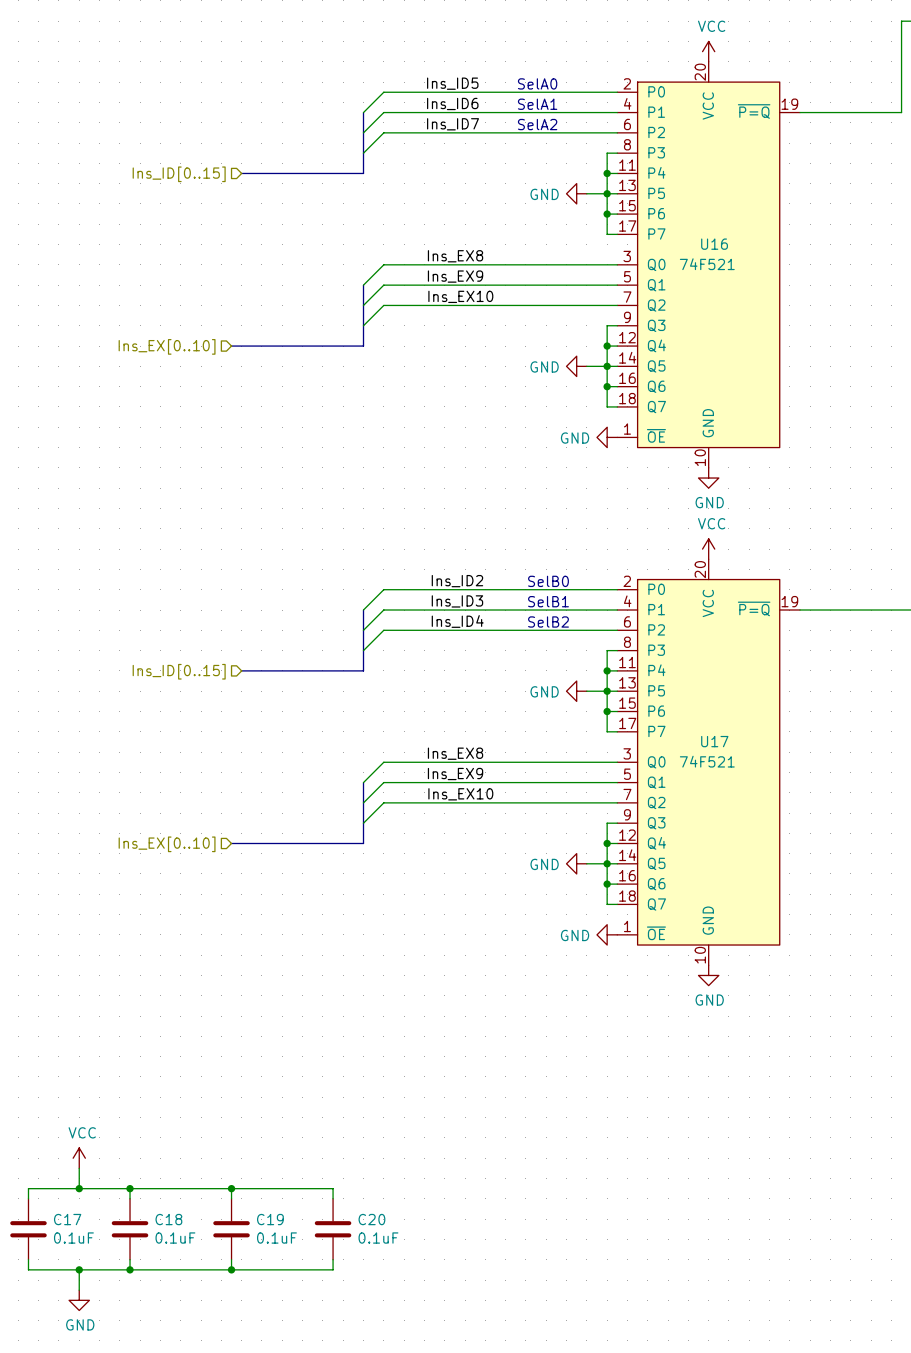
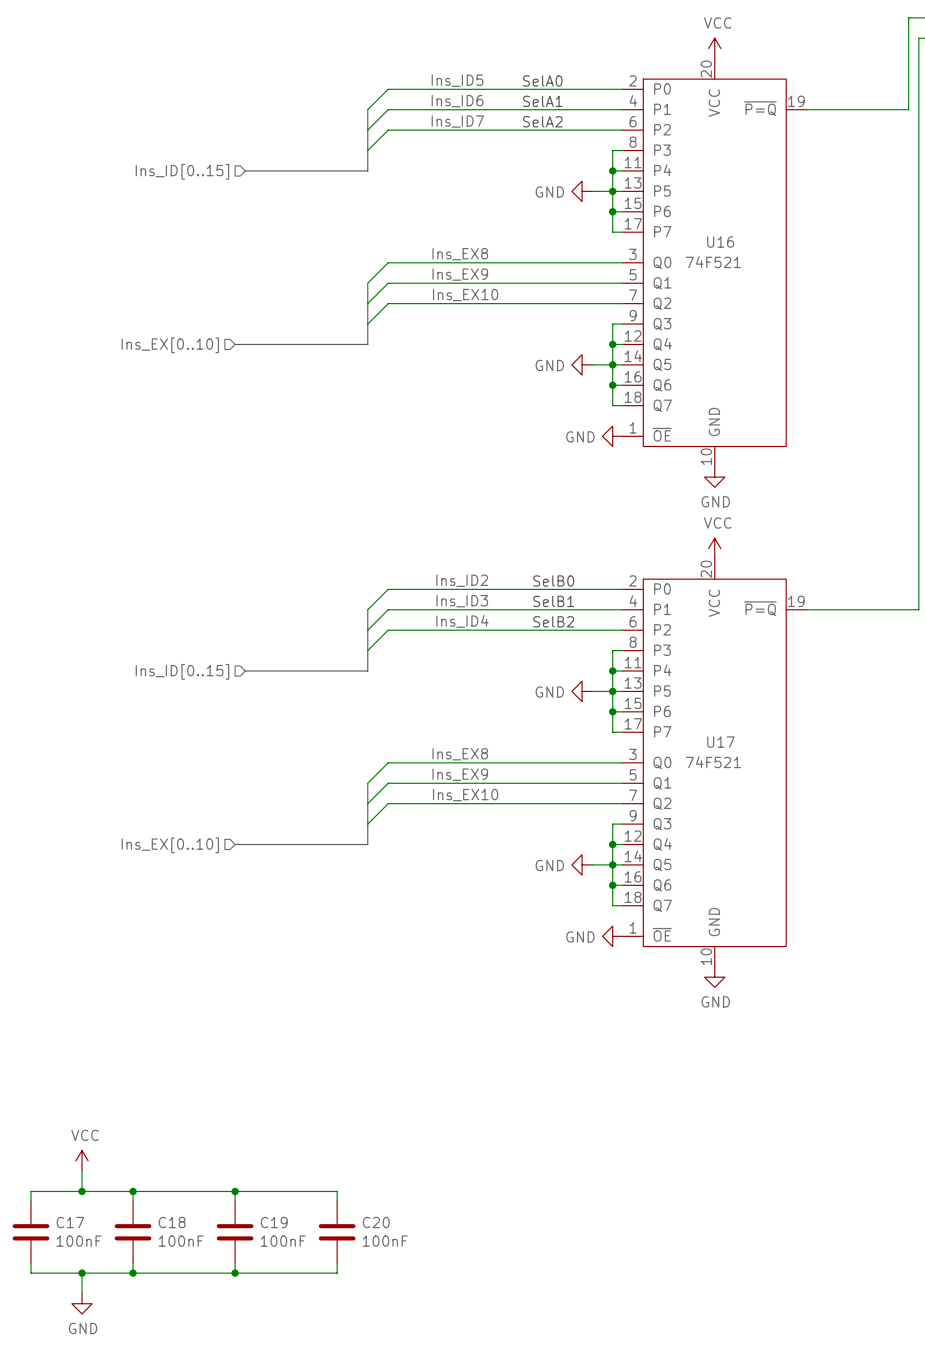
C17 value: 0.1uF (73, 1238) -> 100nF (79, 1241)
C18 value: 0.1uF (175, 1238) -> 100nF (181, 1241)
C19 value: 0.1uF (276, 1238) -> 100nF (283, 1241)
C20 value: 0.1uF (378, 1238) -> 100nF (385, 1241)

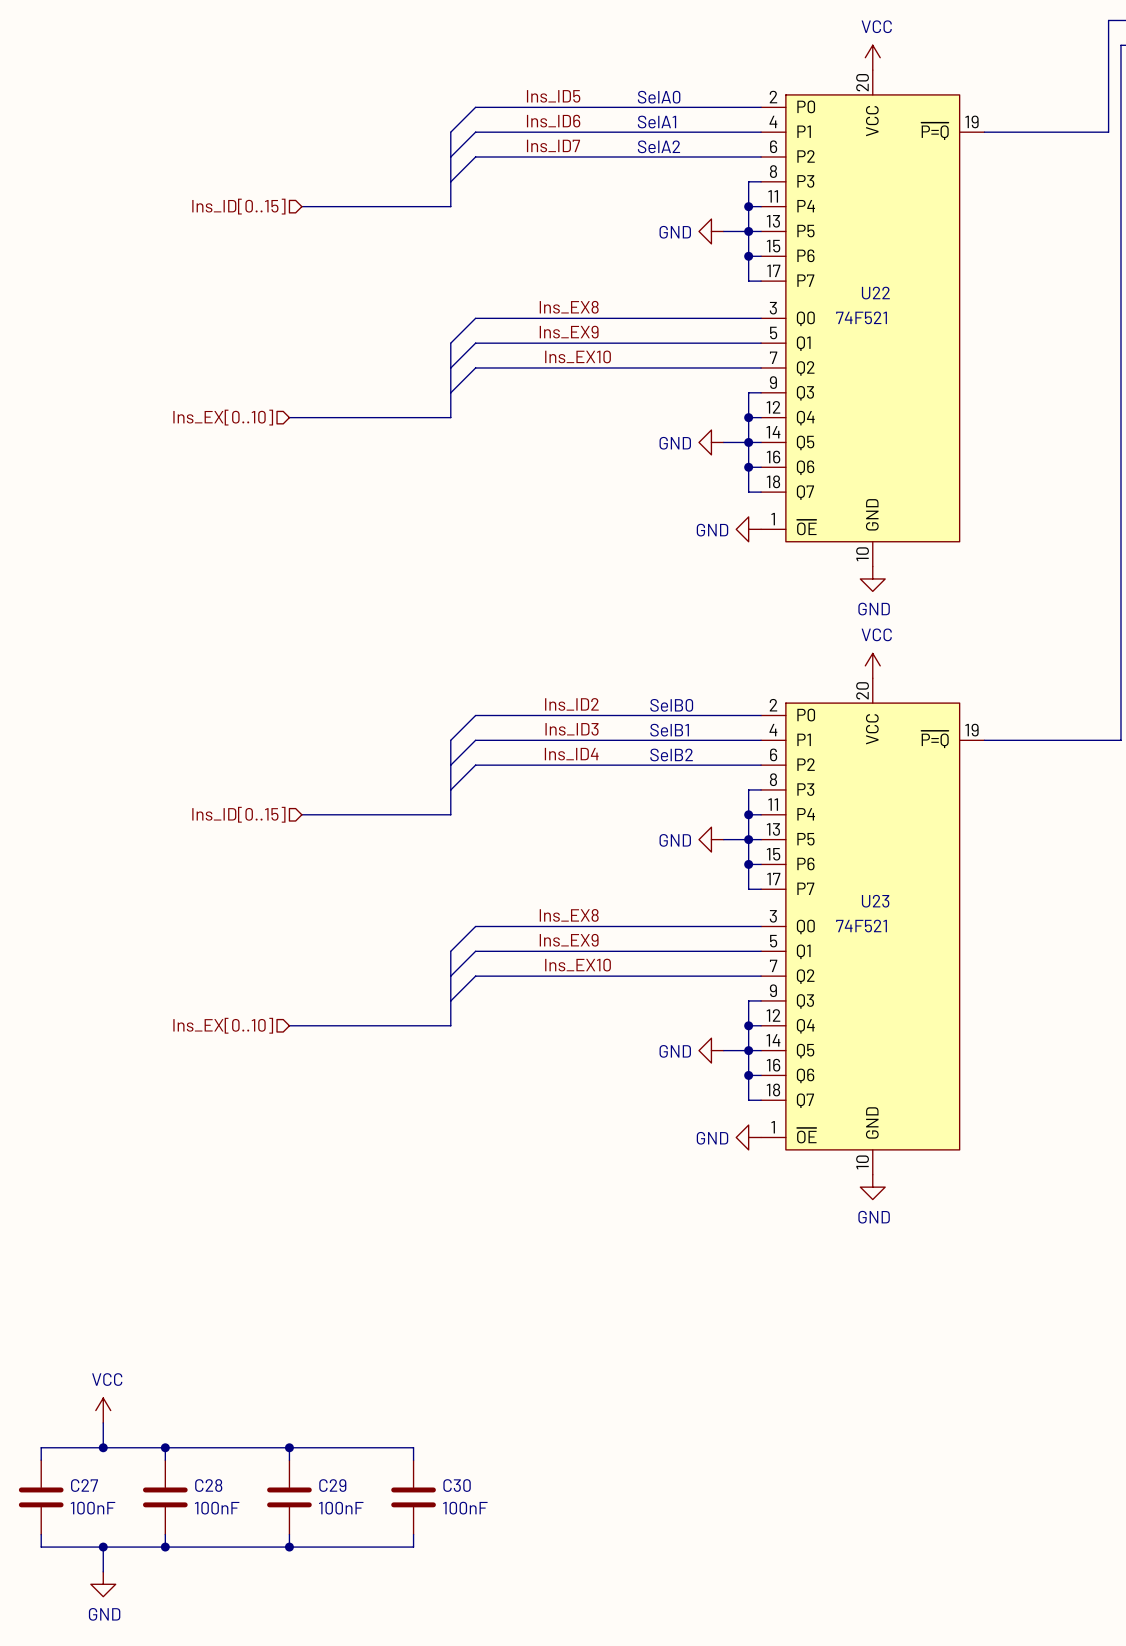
U16 name: U16 (720, 242) -> U22 (875, 293)
U17 name: U17 (720, 742) -> U23 (875, 901)
C17 name: C17 (70, 1222) -> C27 (84, 1485)
C18 name: C18 (172, 1222) -> C28 (208, 1485)
C19 name: C19 (274, 1222) -> C29 (332, 1485)
C20 name: C20 (376, 1222) -> C30 (457, 1485)

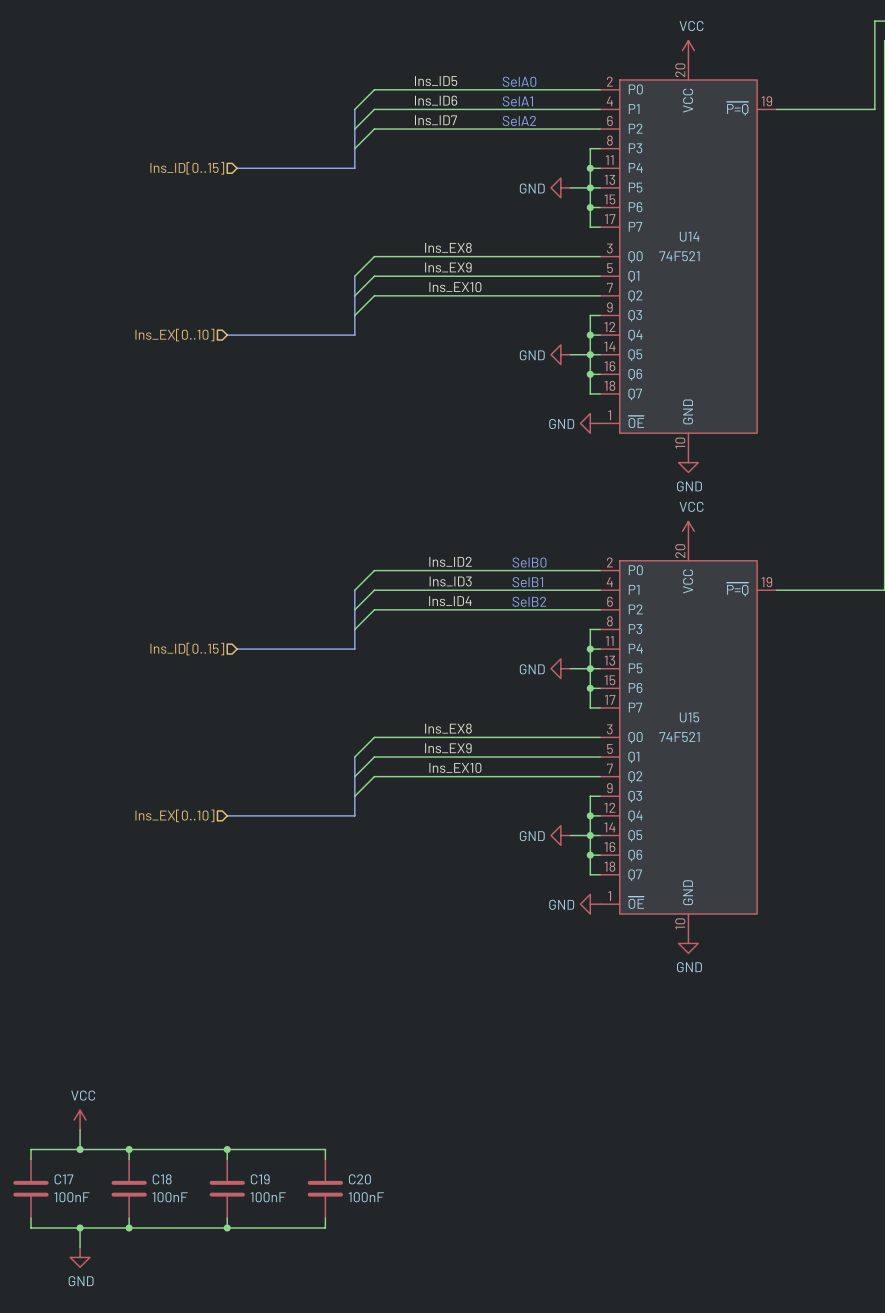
U22 name: U22 (875, 293) -> U14 (689, 236)
U23 name: U23 (875, 901) -> U15 (689, 717)
C27 name: C27 (84, 1485) -> C17 (63, 1179)
C28 name: C28 (208, 1485) -> C18 (162, 1179)
C29 name: C29 (332, 1485) -> C19 (260, 1179)
C30 name: C30 (457, 1485) -> C20 (359, 1179)

